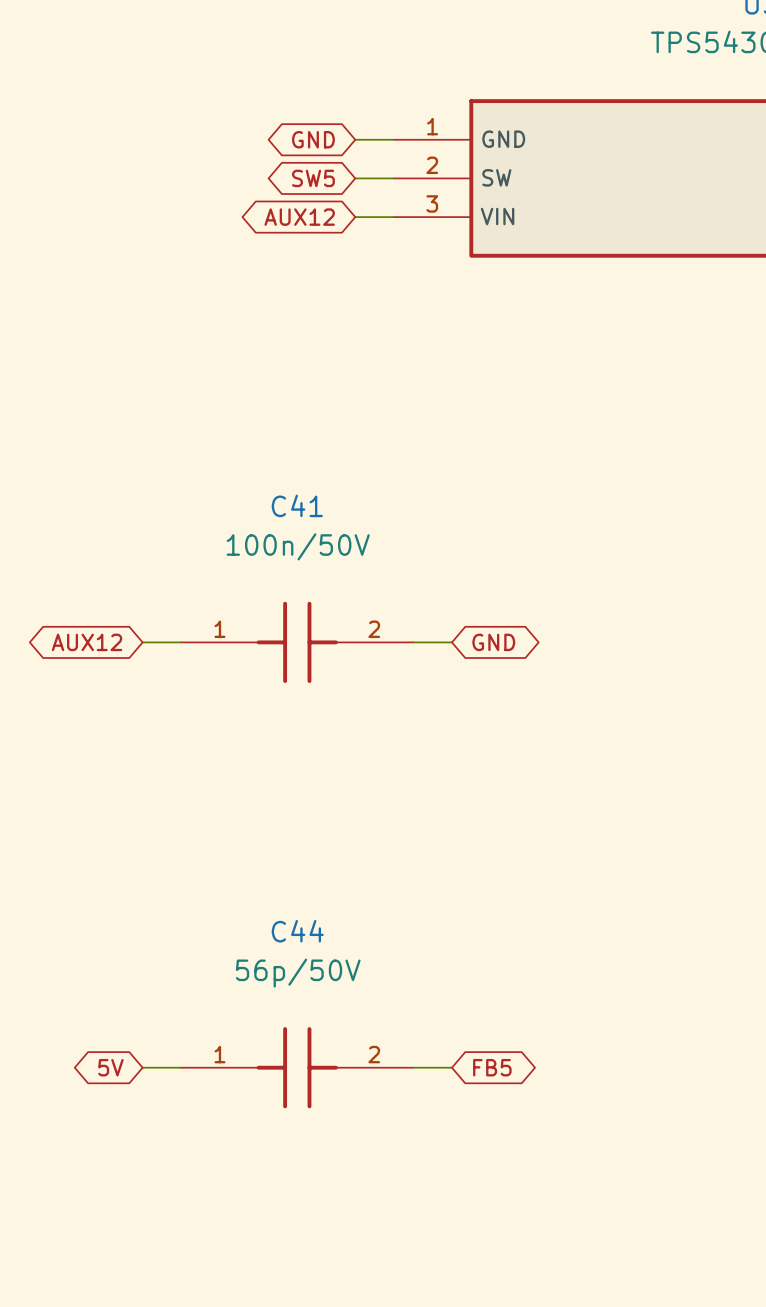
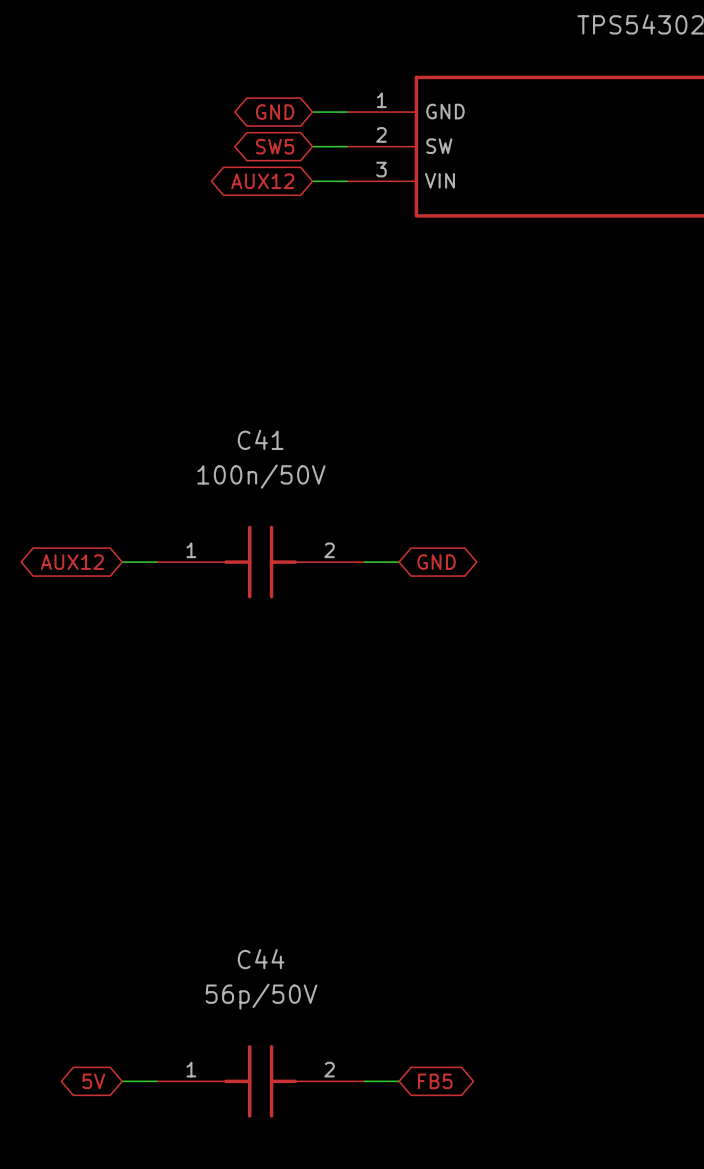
global label position: 5V (110, 1067) -> 5V (93, 1081)
wire: (142, 1067) (181, 1067) -> (122, 1081) (156, 1081)
C44 position: (297, 1067) -> (260, 1081)
wire: (413, 1067) (451, 1067) -> (364, 1081) (399, 1081)
global label position: FB5 (492, 1067) -> FB5 (435, 1081)

